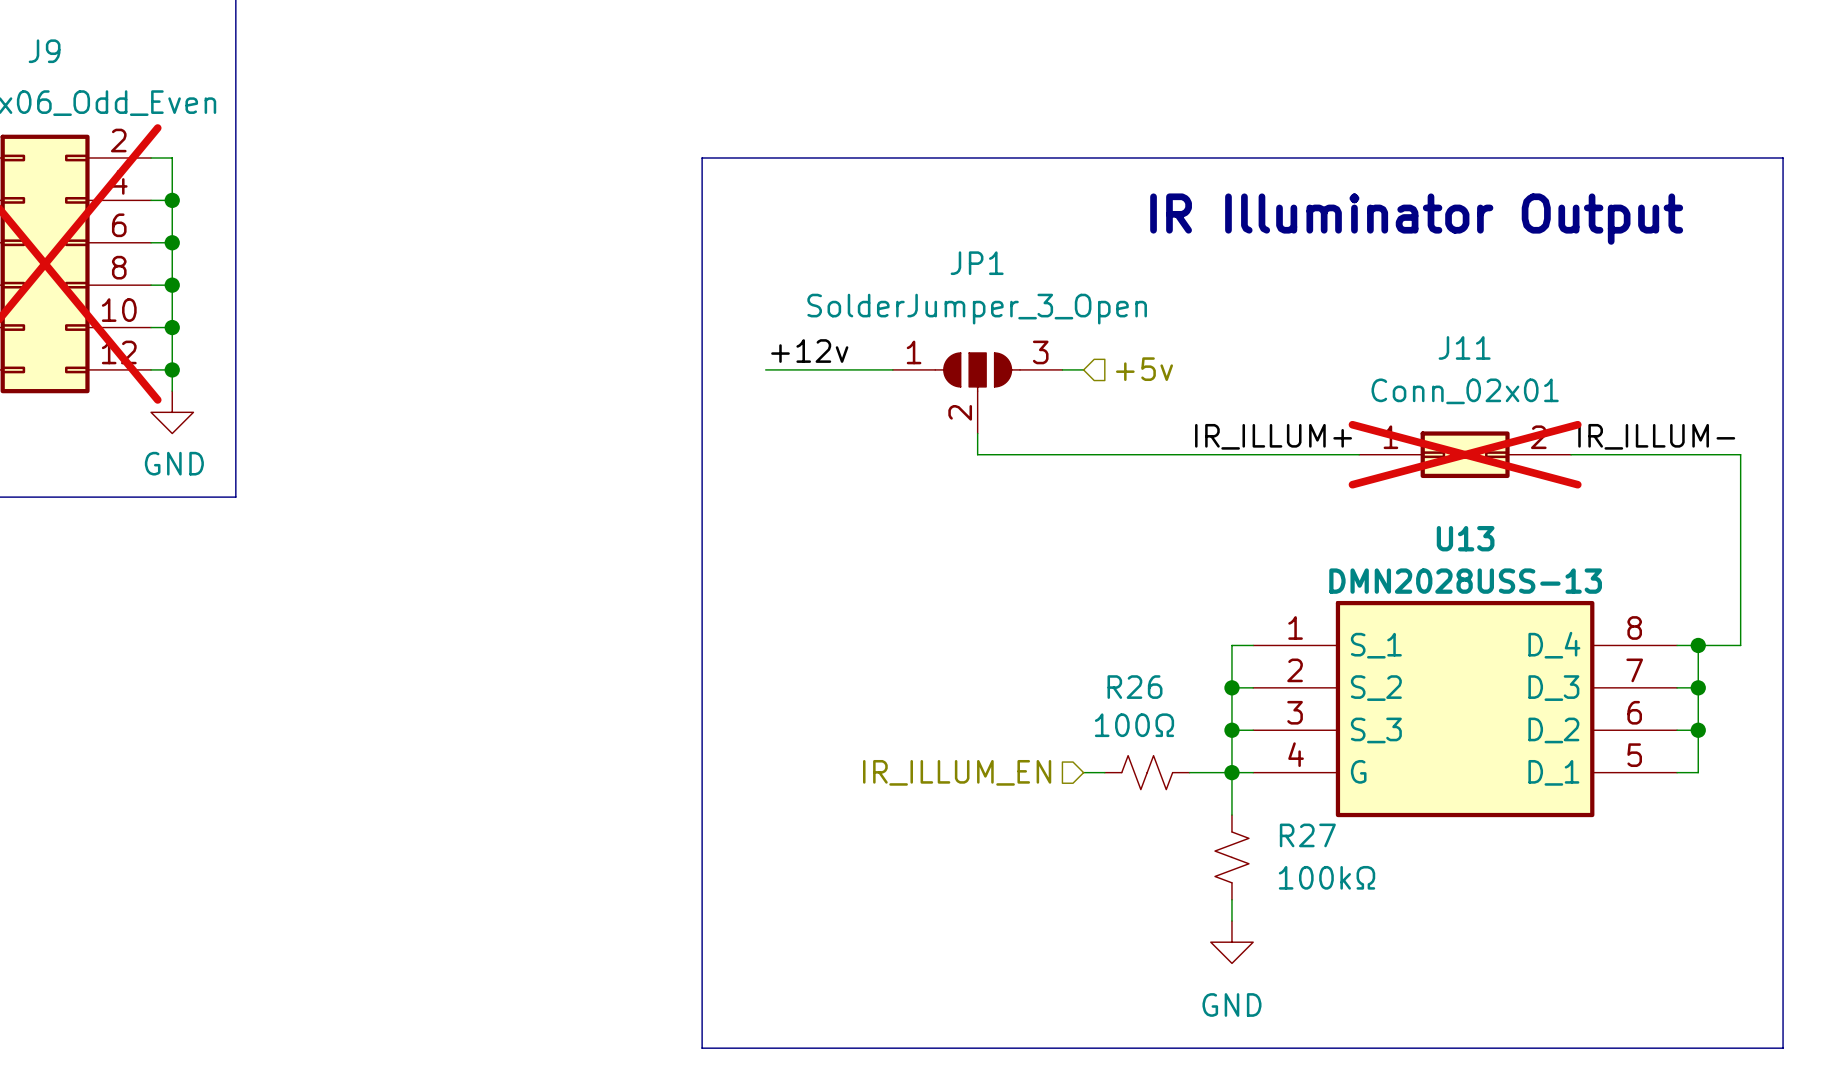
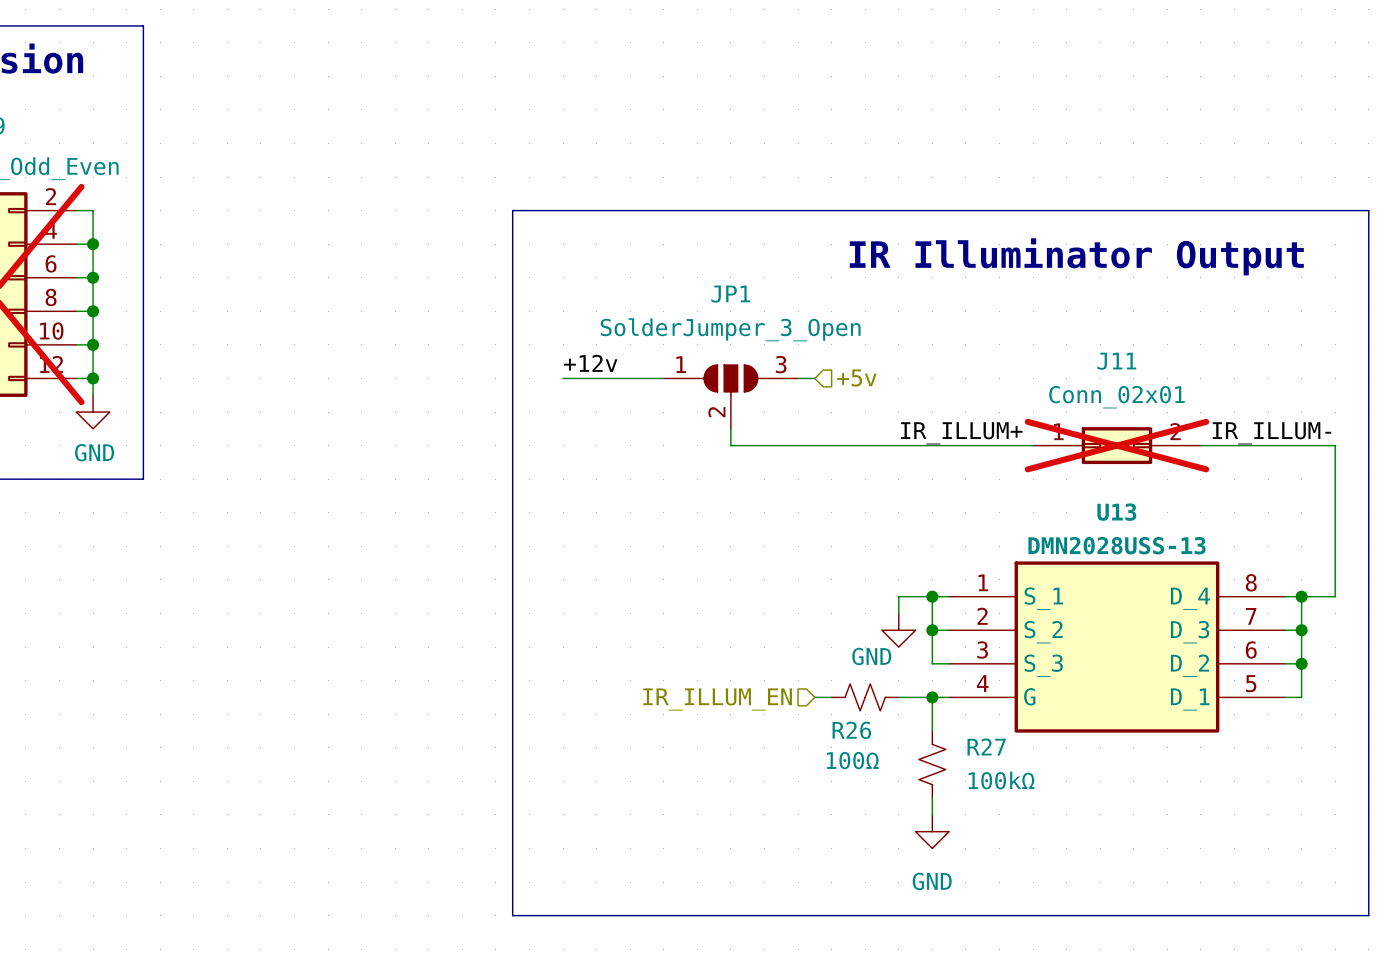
wire: none -> (932, 596) (898, 596) (898, 613)
R26 name position: R26 (1134, 687) -> R26 (851, 730)
power symbol: none -> GND (898, 630)
R26 value position: 100Ω (1134, 725) -> 100Ω (852, 760)
wire: (1231, 730) (1231, 772) -> none
junction position: (1231, 730) -> (932, 596)

